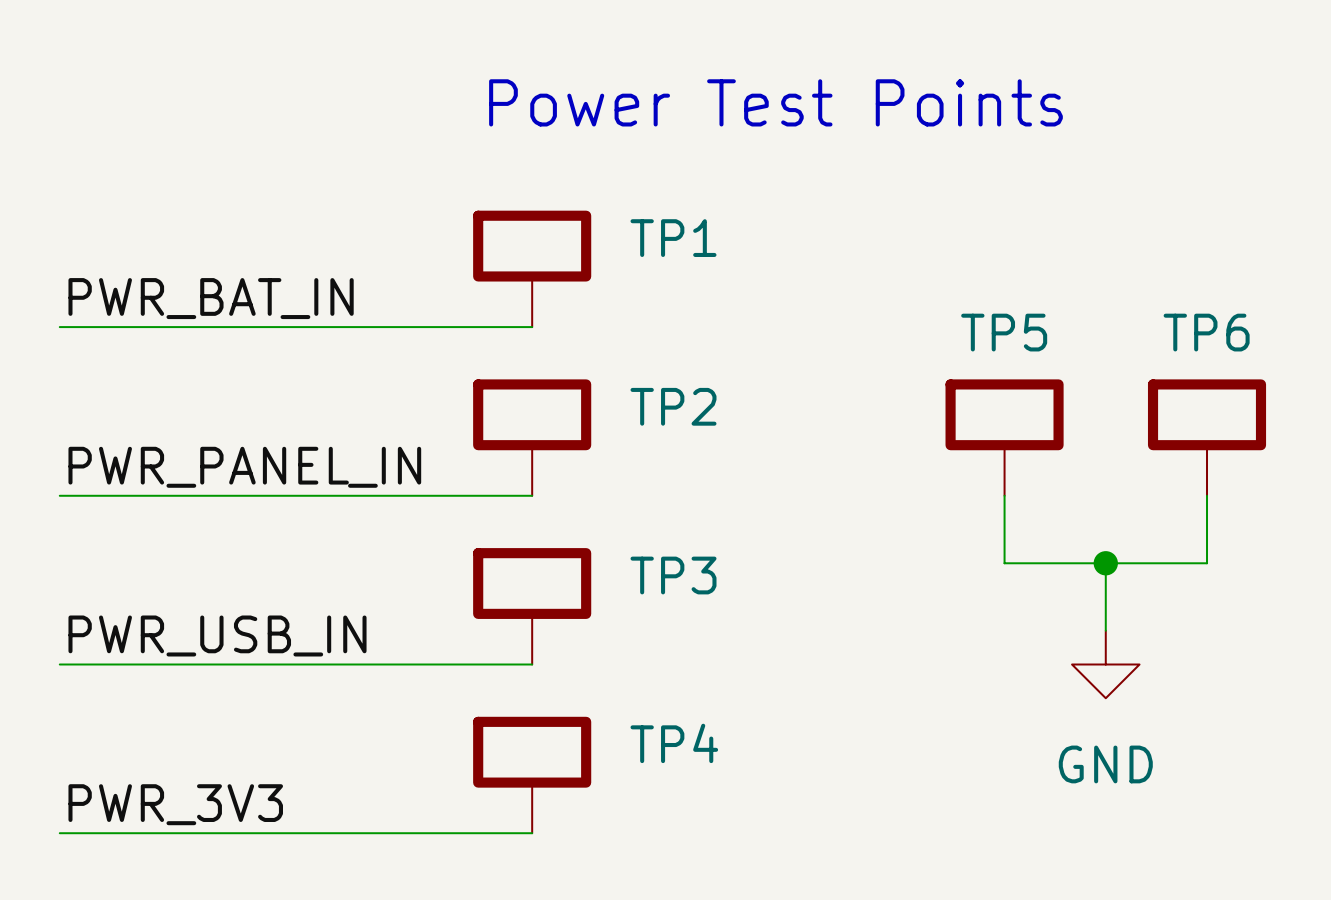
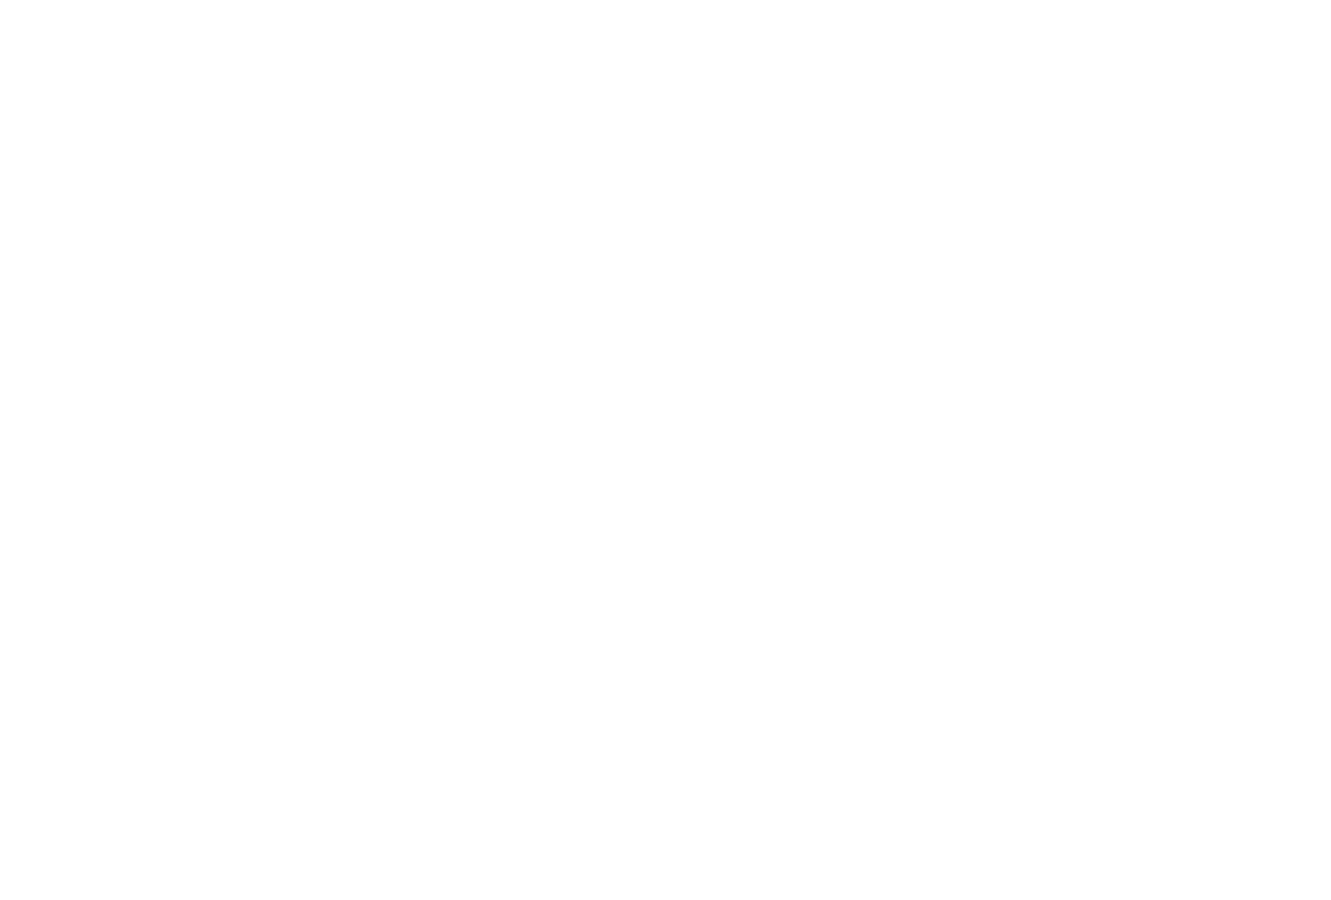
text: Power Test Points (775, 102) -> none
TP1: (532, 268) -> none
label: PWR_BAT_IN (211, 298) -> none
wire: (59, 327) (532, 327) -> none
TP2: (532, 437) -> none
TP5: (1004, 437) -> none
TP6: (1207, 437) -> none
label: PWR_PANEL_IN (244, 467) -> none
wire: (59, 495) (532, 495) -> none
wire: (1004, 495) (1004, 563) (1207, 563) (1207, 495) -> none
wire: (1105, 563) (1105, 630) -> none
junction: (1105, 563) -> none
TP3: (532, 606) -> none
label: PWR_USB_IN (217, 635) -> none
wire: (59, 664) (532, 664) -> none
power symbol: GND (1105, 664) -> none
TP4: (532, 775) -> none
label: PWR_3V3 (175, 804) -> none
wire: (59, 833) (532, 833) -> none

